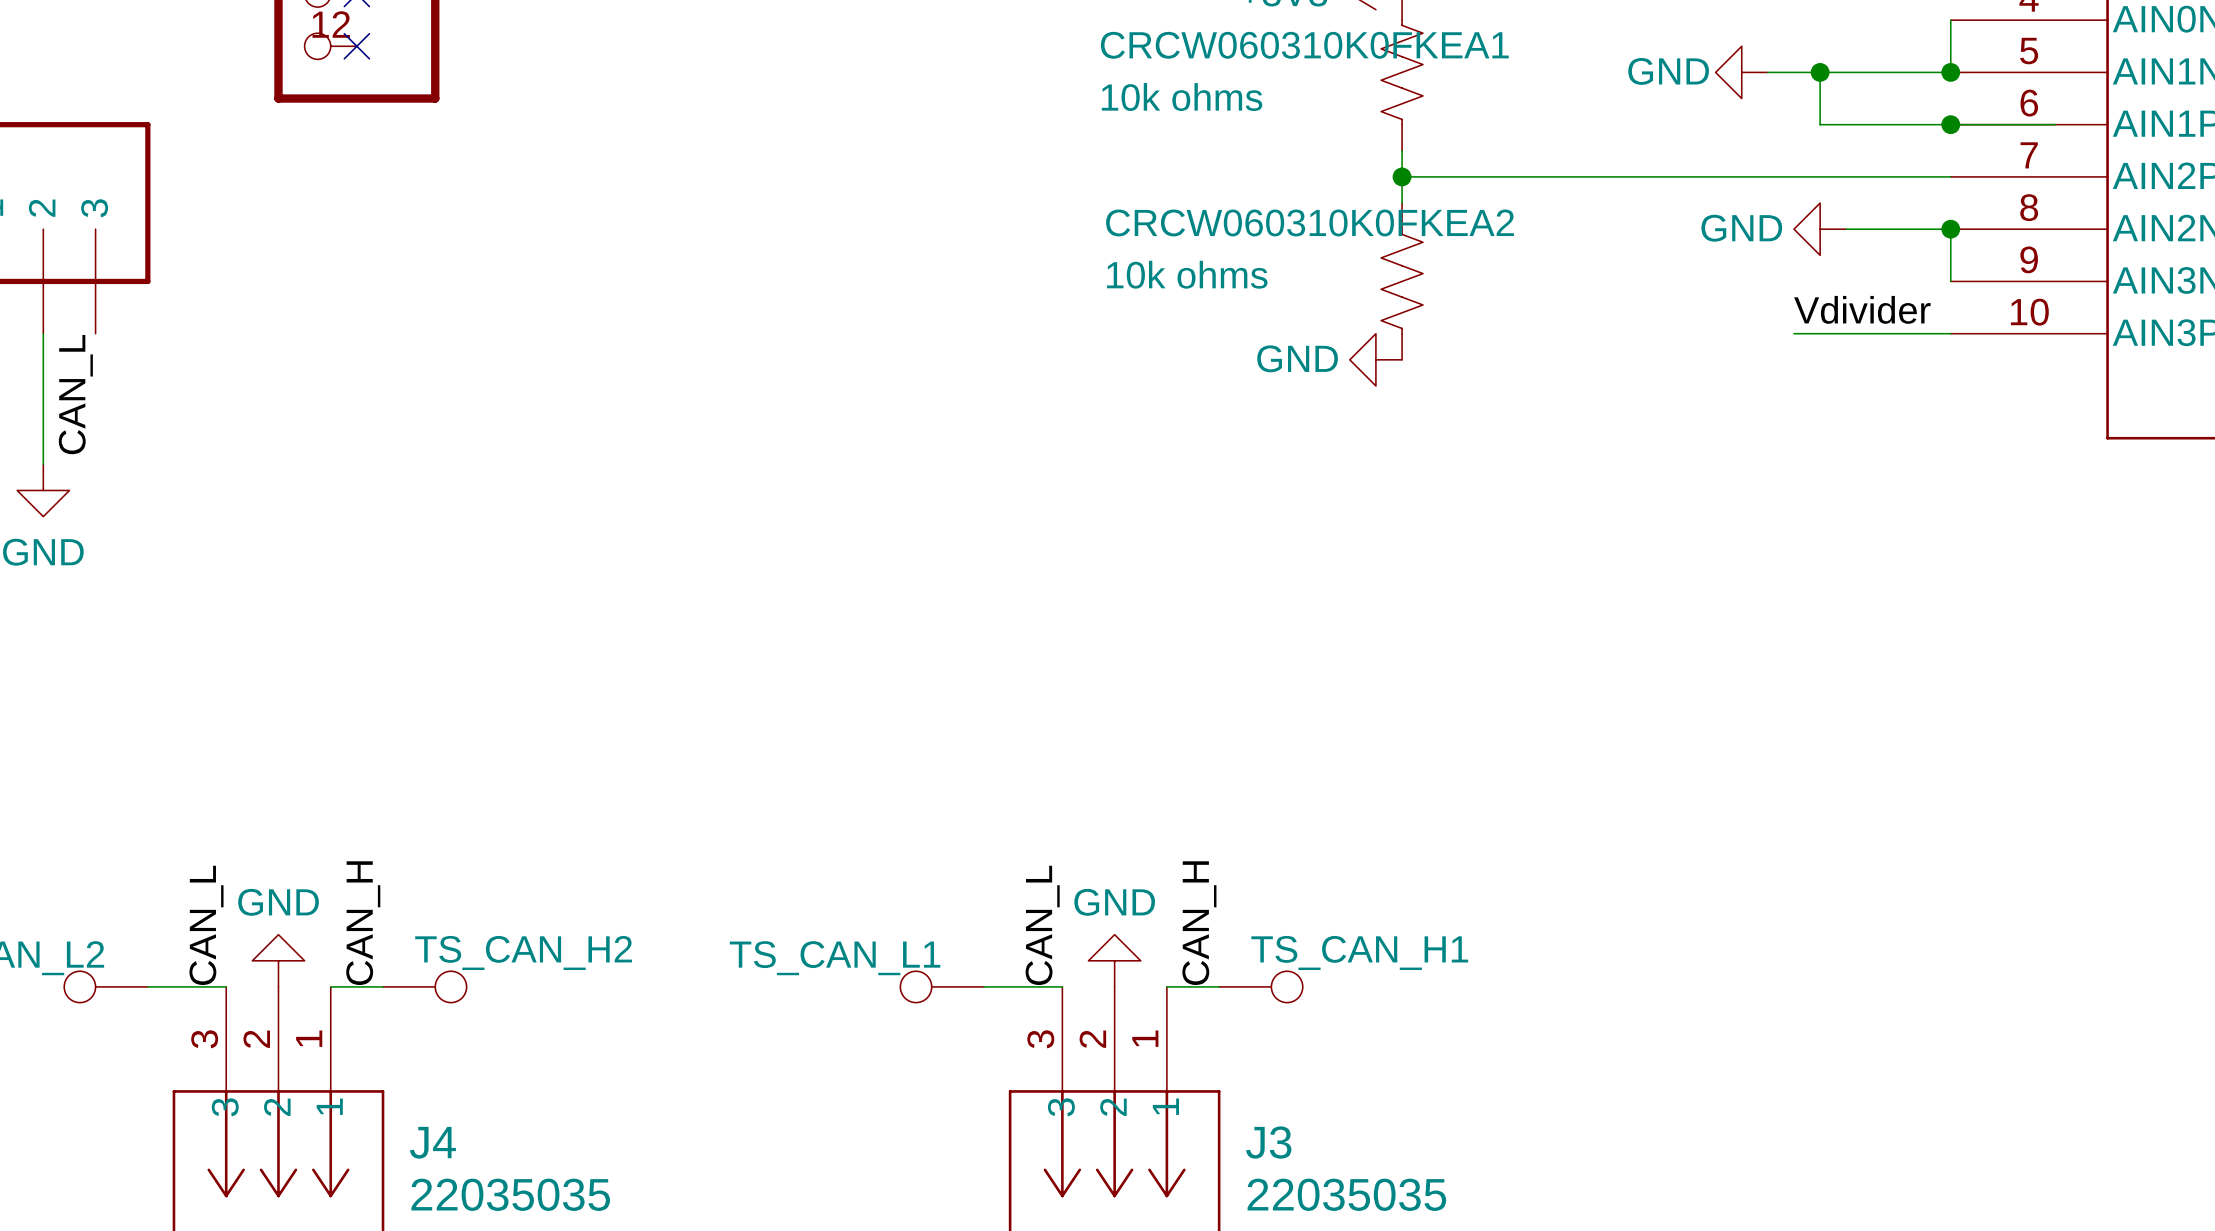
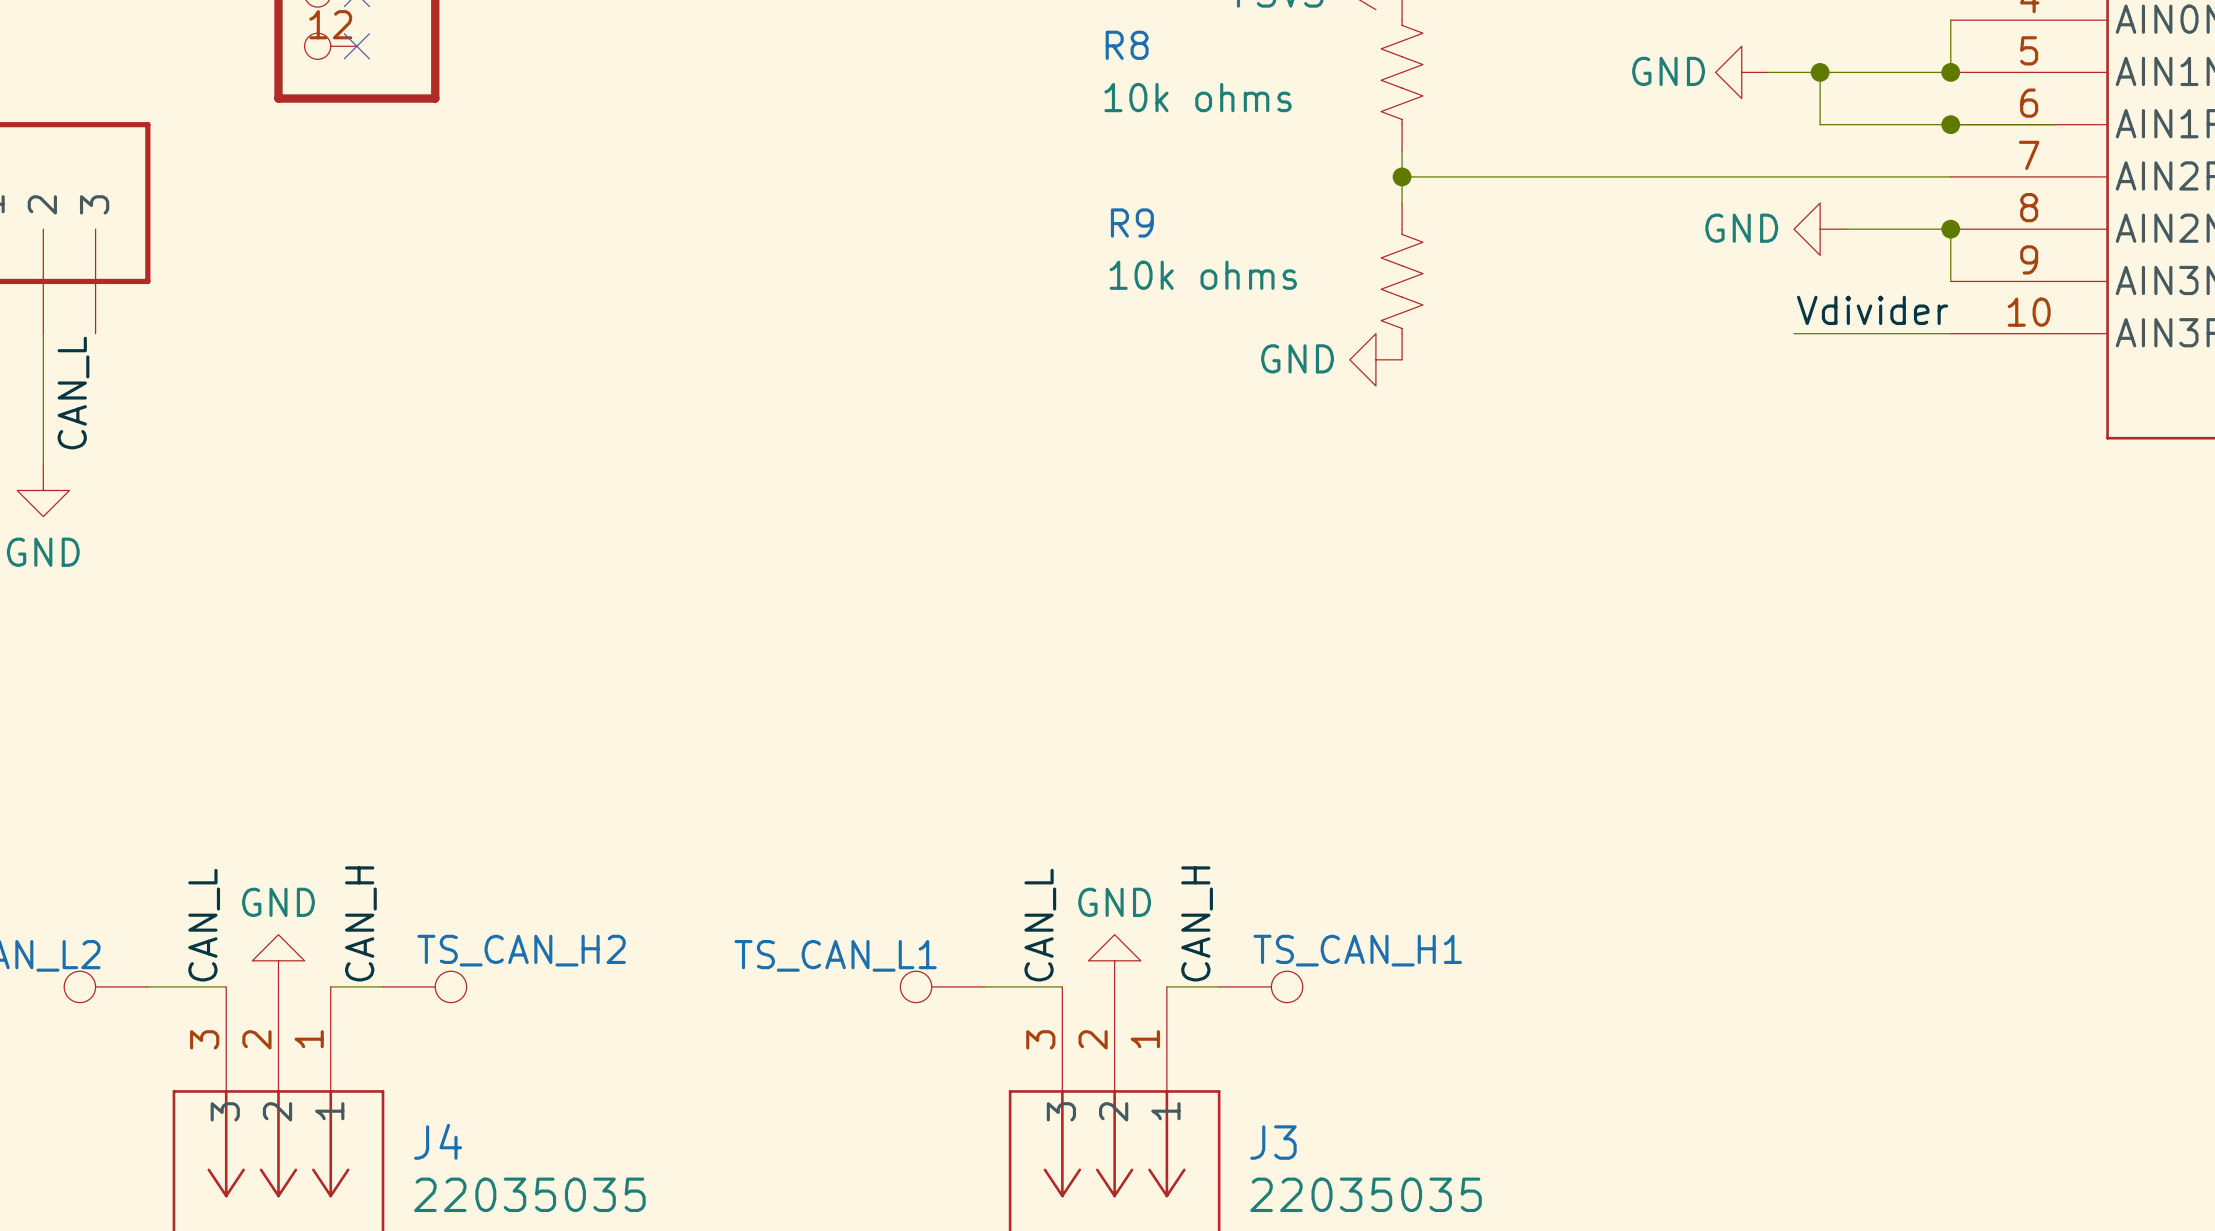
CRCW060310K0FKEA1 name: CRCW060310K0FKEA1 (1304, 45) -> R8 (1127, 45)
CRCW060310K0FKEA2 name: CRCW060310K0FKEA2 (1310, 222) -> R9 (1132, 222)

